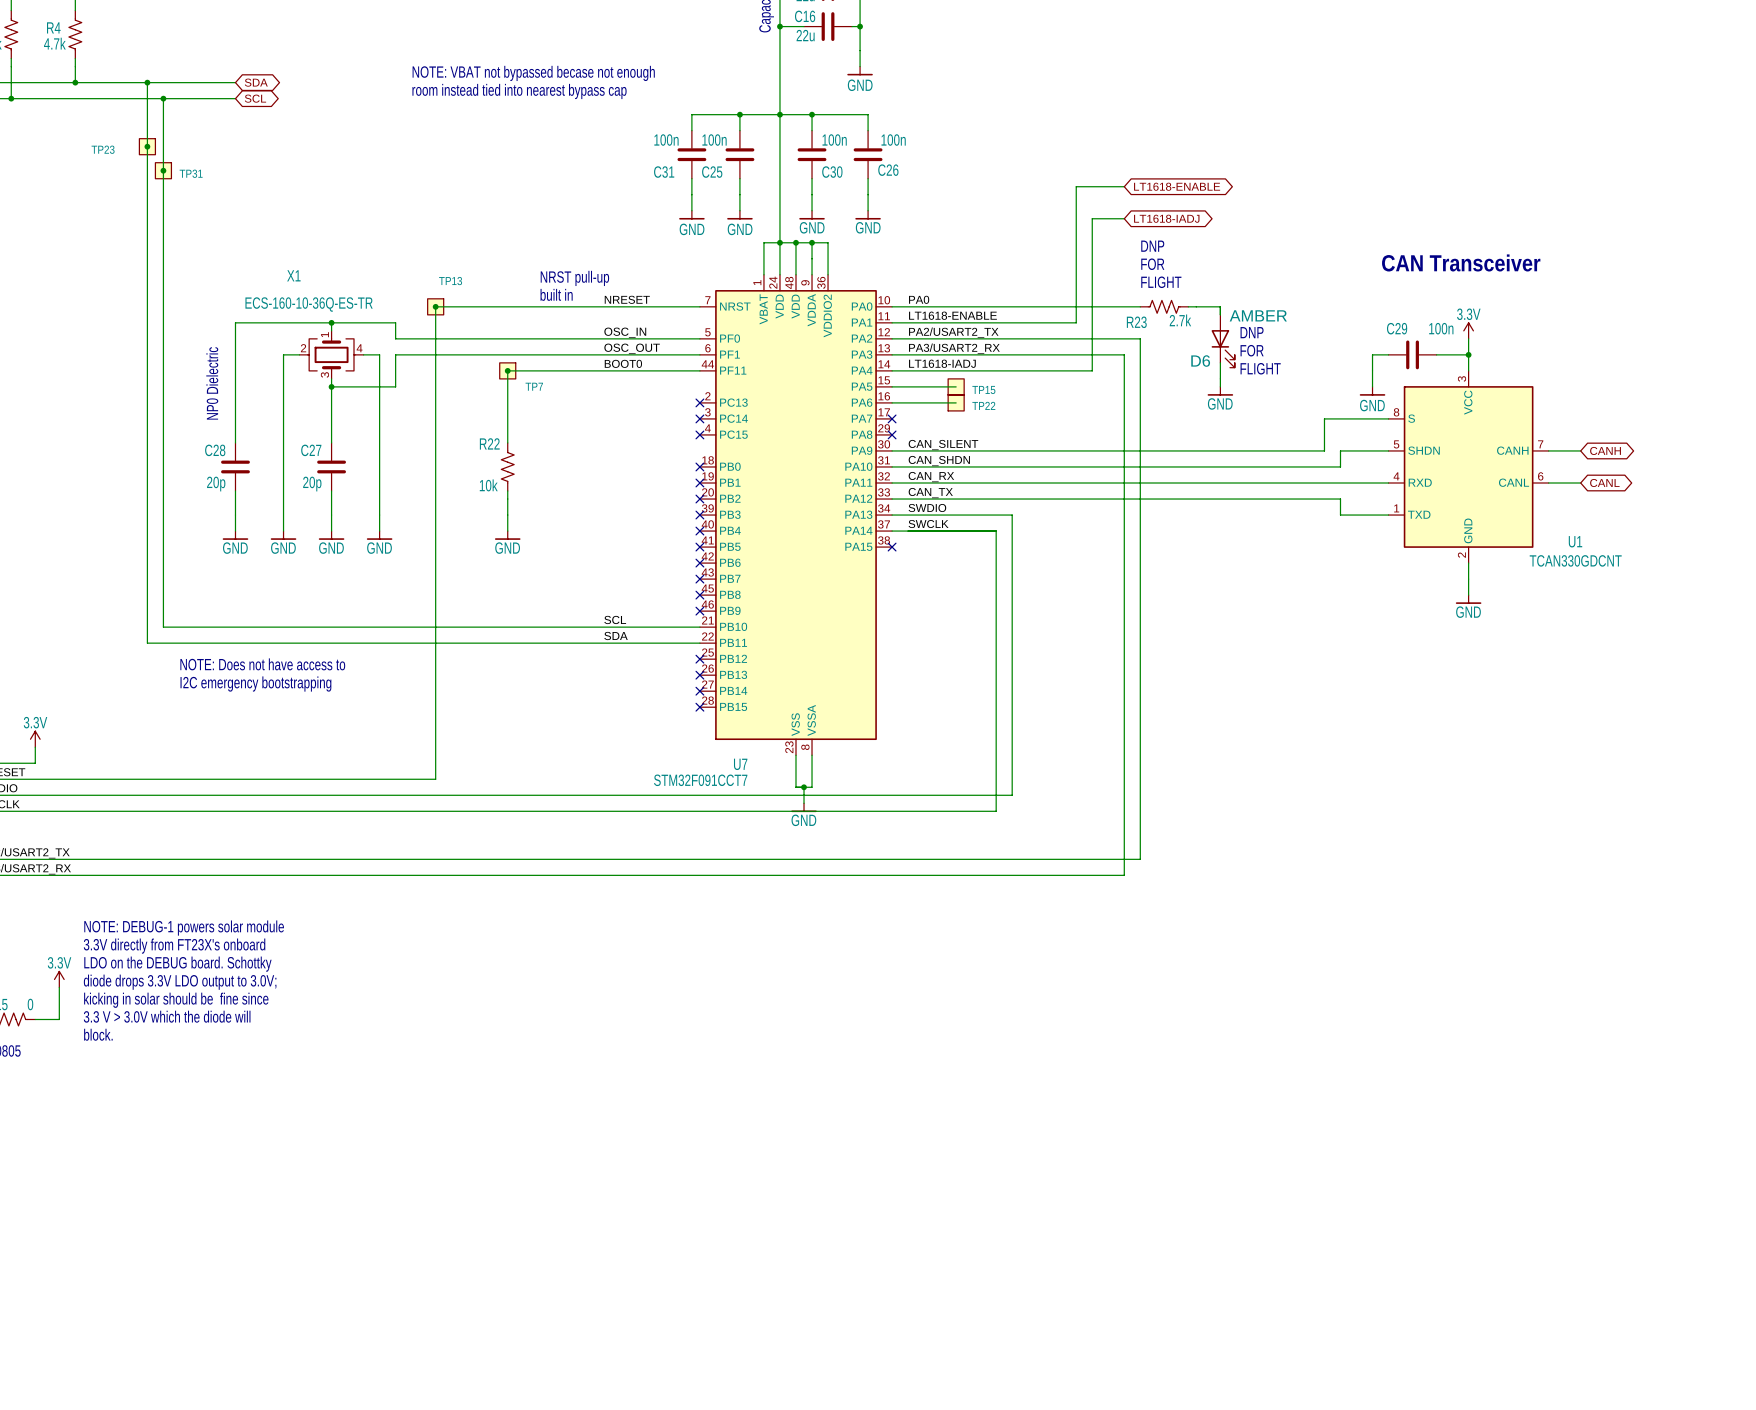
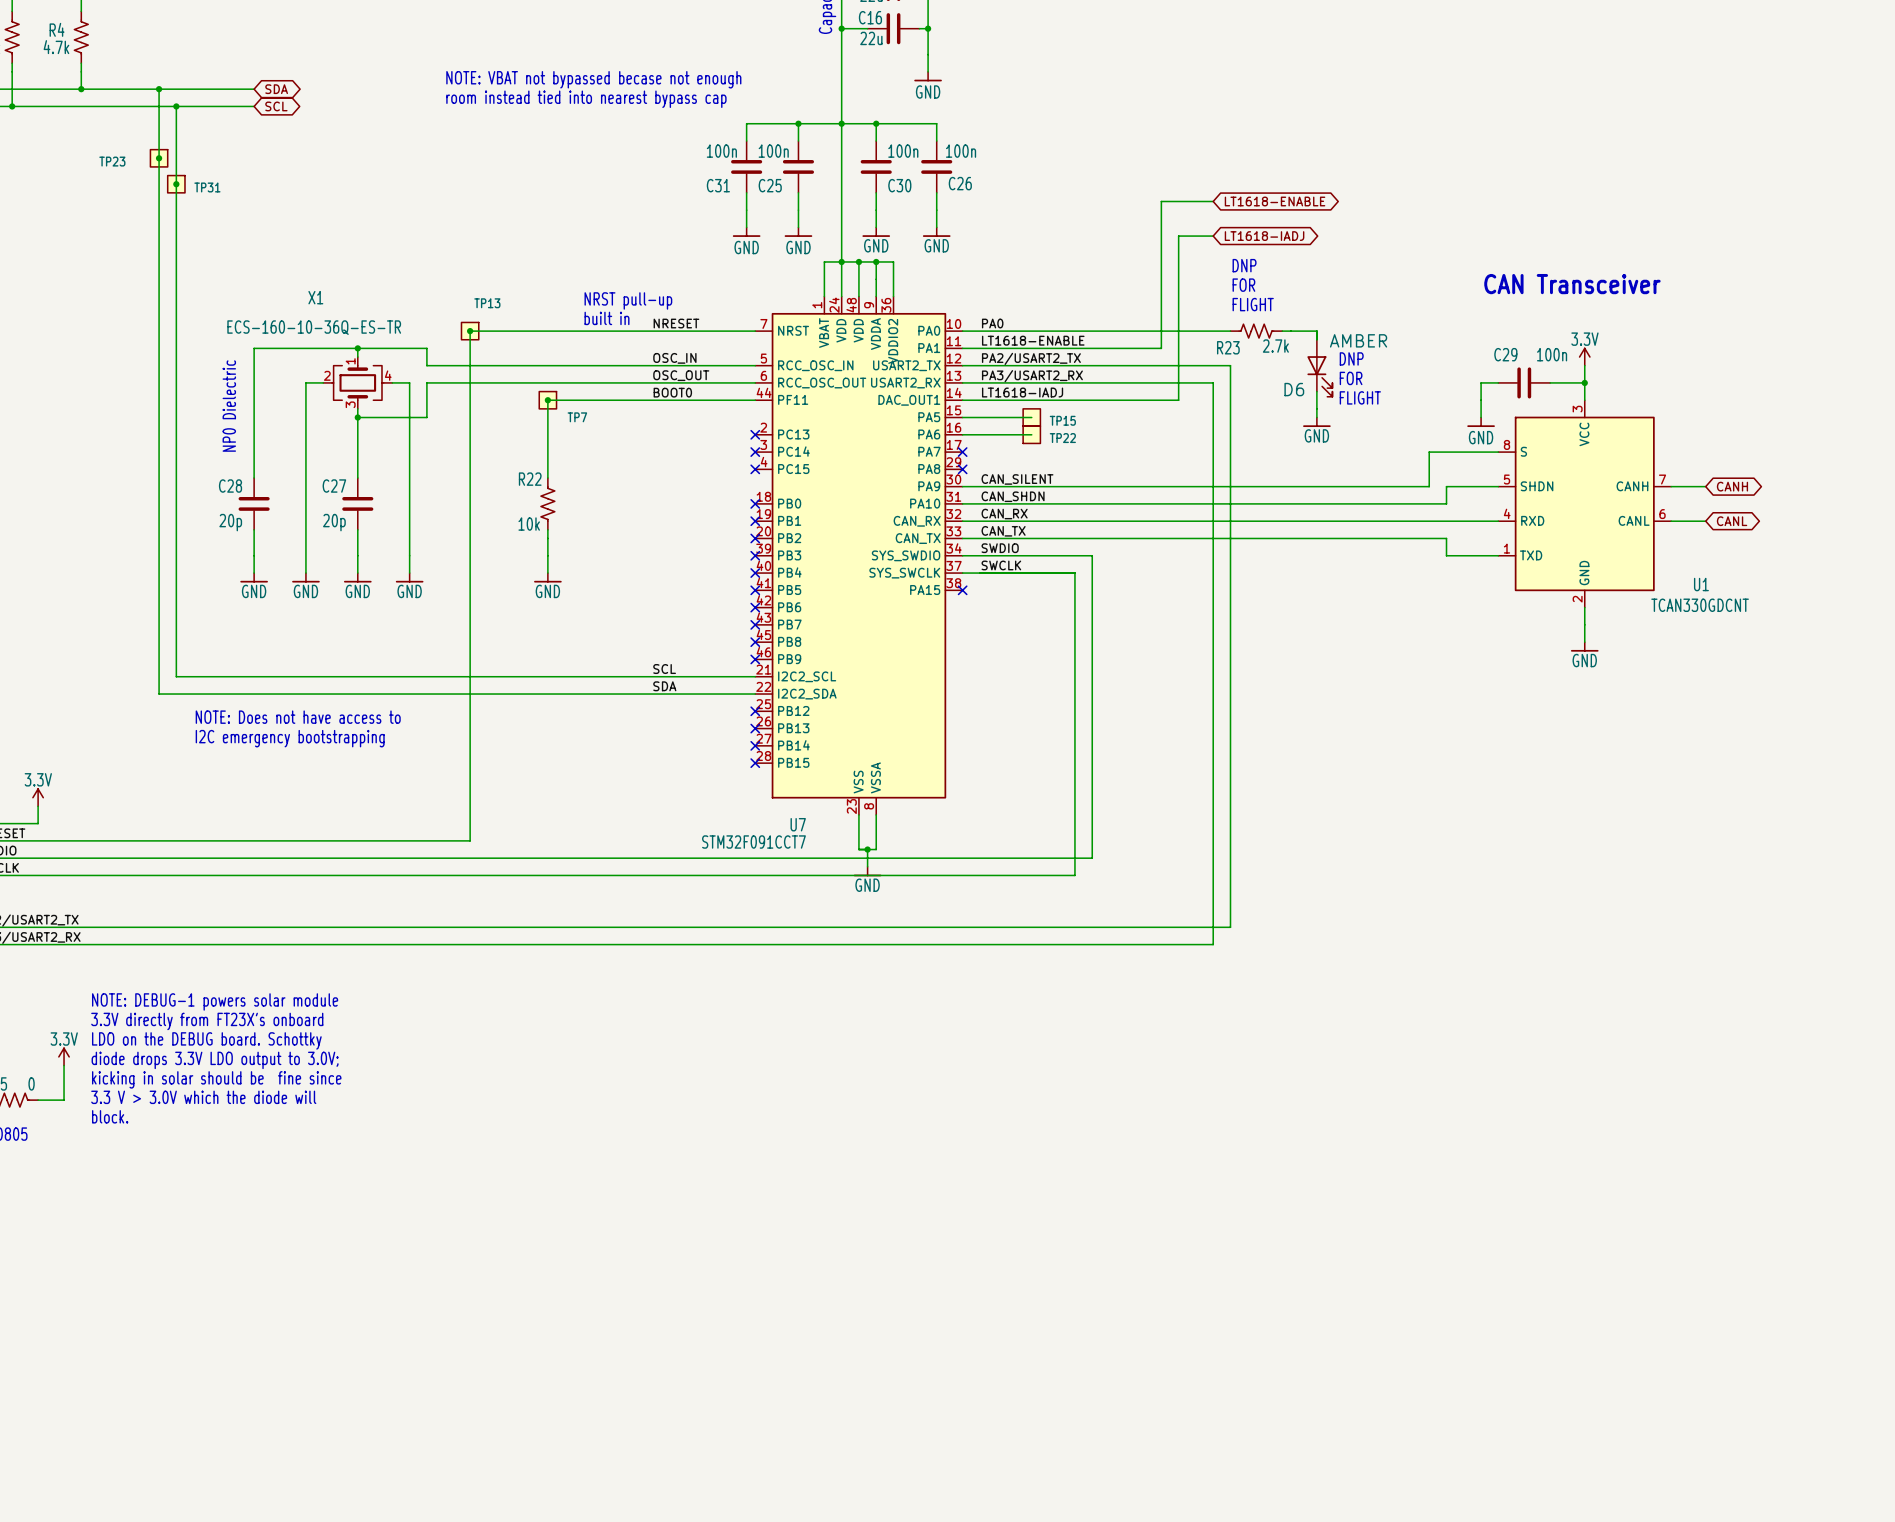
U7 symbol: [699, 274, 893, 756] -> [755, 296, 963, 815]

